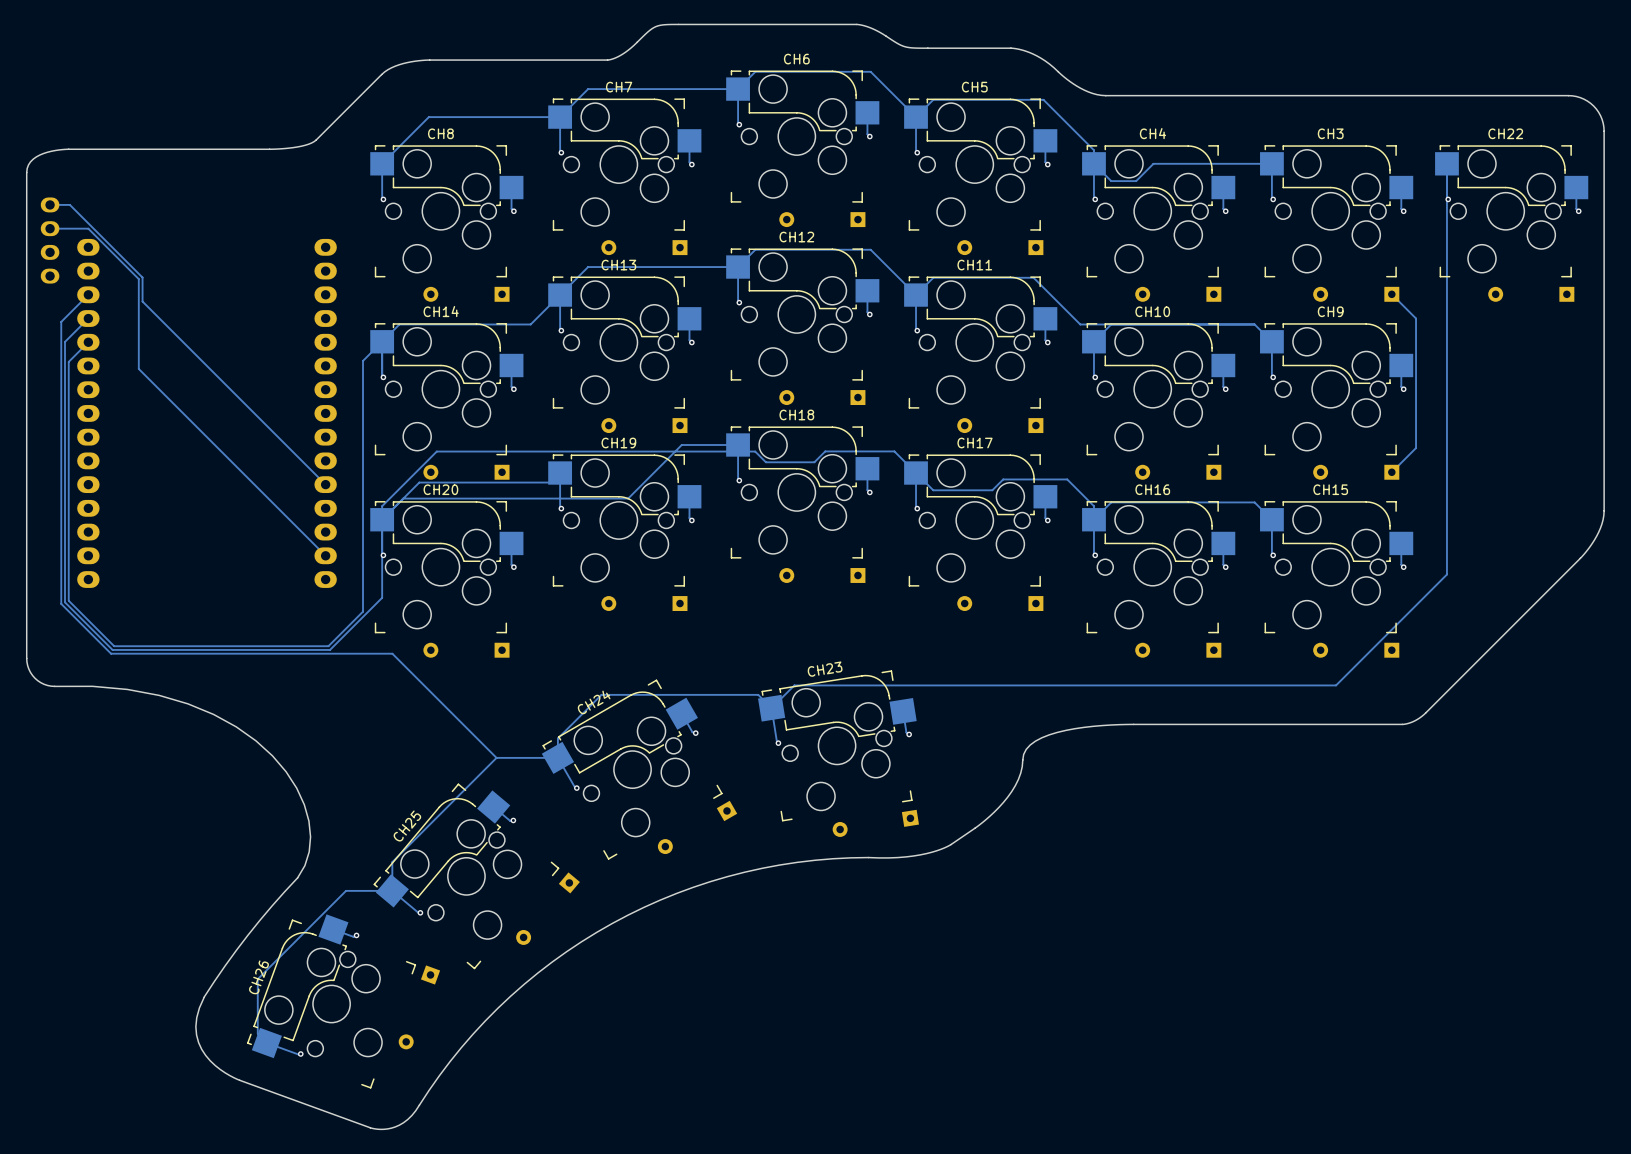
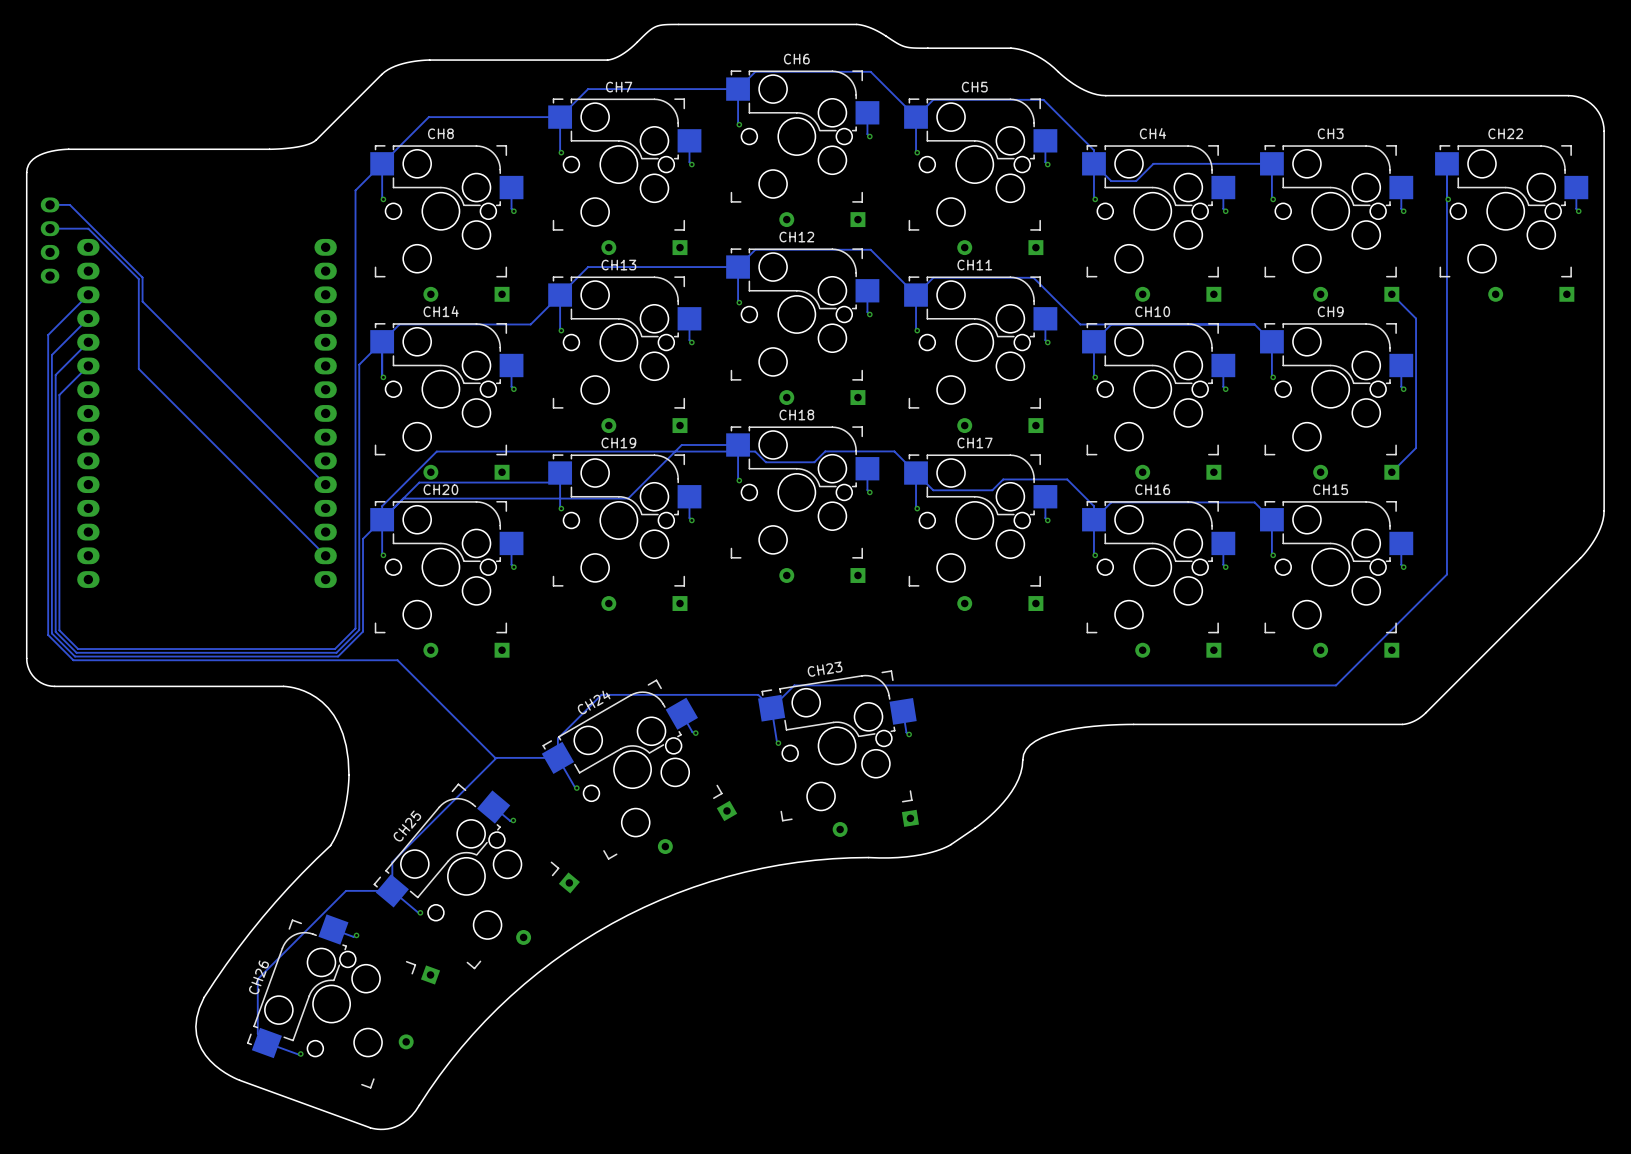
track: none -> (382, 163) (355, 190) (355, 628) (334, 649) (78, 649) (59, 630) (59, 394) (88, 365)
track: (61, 321) (61, 603) (111, 653) (392, 653) (496, 757) -> (61, 321) (48, 335) (48, 635) (73, 660) (397, 660) (496, 757)
track: (65, 341) (65, 602) (112, 649) (330, 649) (382, 597) (382, 554) -> none
track: (363, 360) (363, 538) -> (382, 519) (363, 538)
track: none -> (363, 360) (359, 364) (359, 630) (336, 652) (76, 652) (55, 631) (55, 374) (68, 361)
track: (68, 361) (68, 600) (114, 646) (328, 646) (363, 611) -> (65, 341) (51, 354) (51, 633) (74, 656) (338, 656) (363, 631) (363, 611)
board edge: (54, 686) (92, 686) (127, 689) (159, 695) (187, 703) (213, 714) (255, 740) (272, 755) (296, 788) (308, 821) (309, 851) (304, 865) (297, 877) (247, 935) (204, 997) -> (54, 686) (289, 686) (304, 691) (316, 697) (328, 708) (338, 723) (346, 745) (348, 775) (345, 805) (336, 834) (330, 845) (302, 873) (262, 917) (237, 948) (204, 997)

